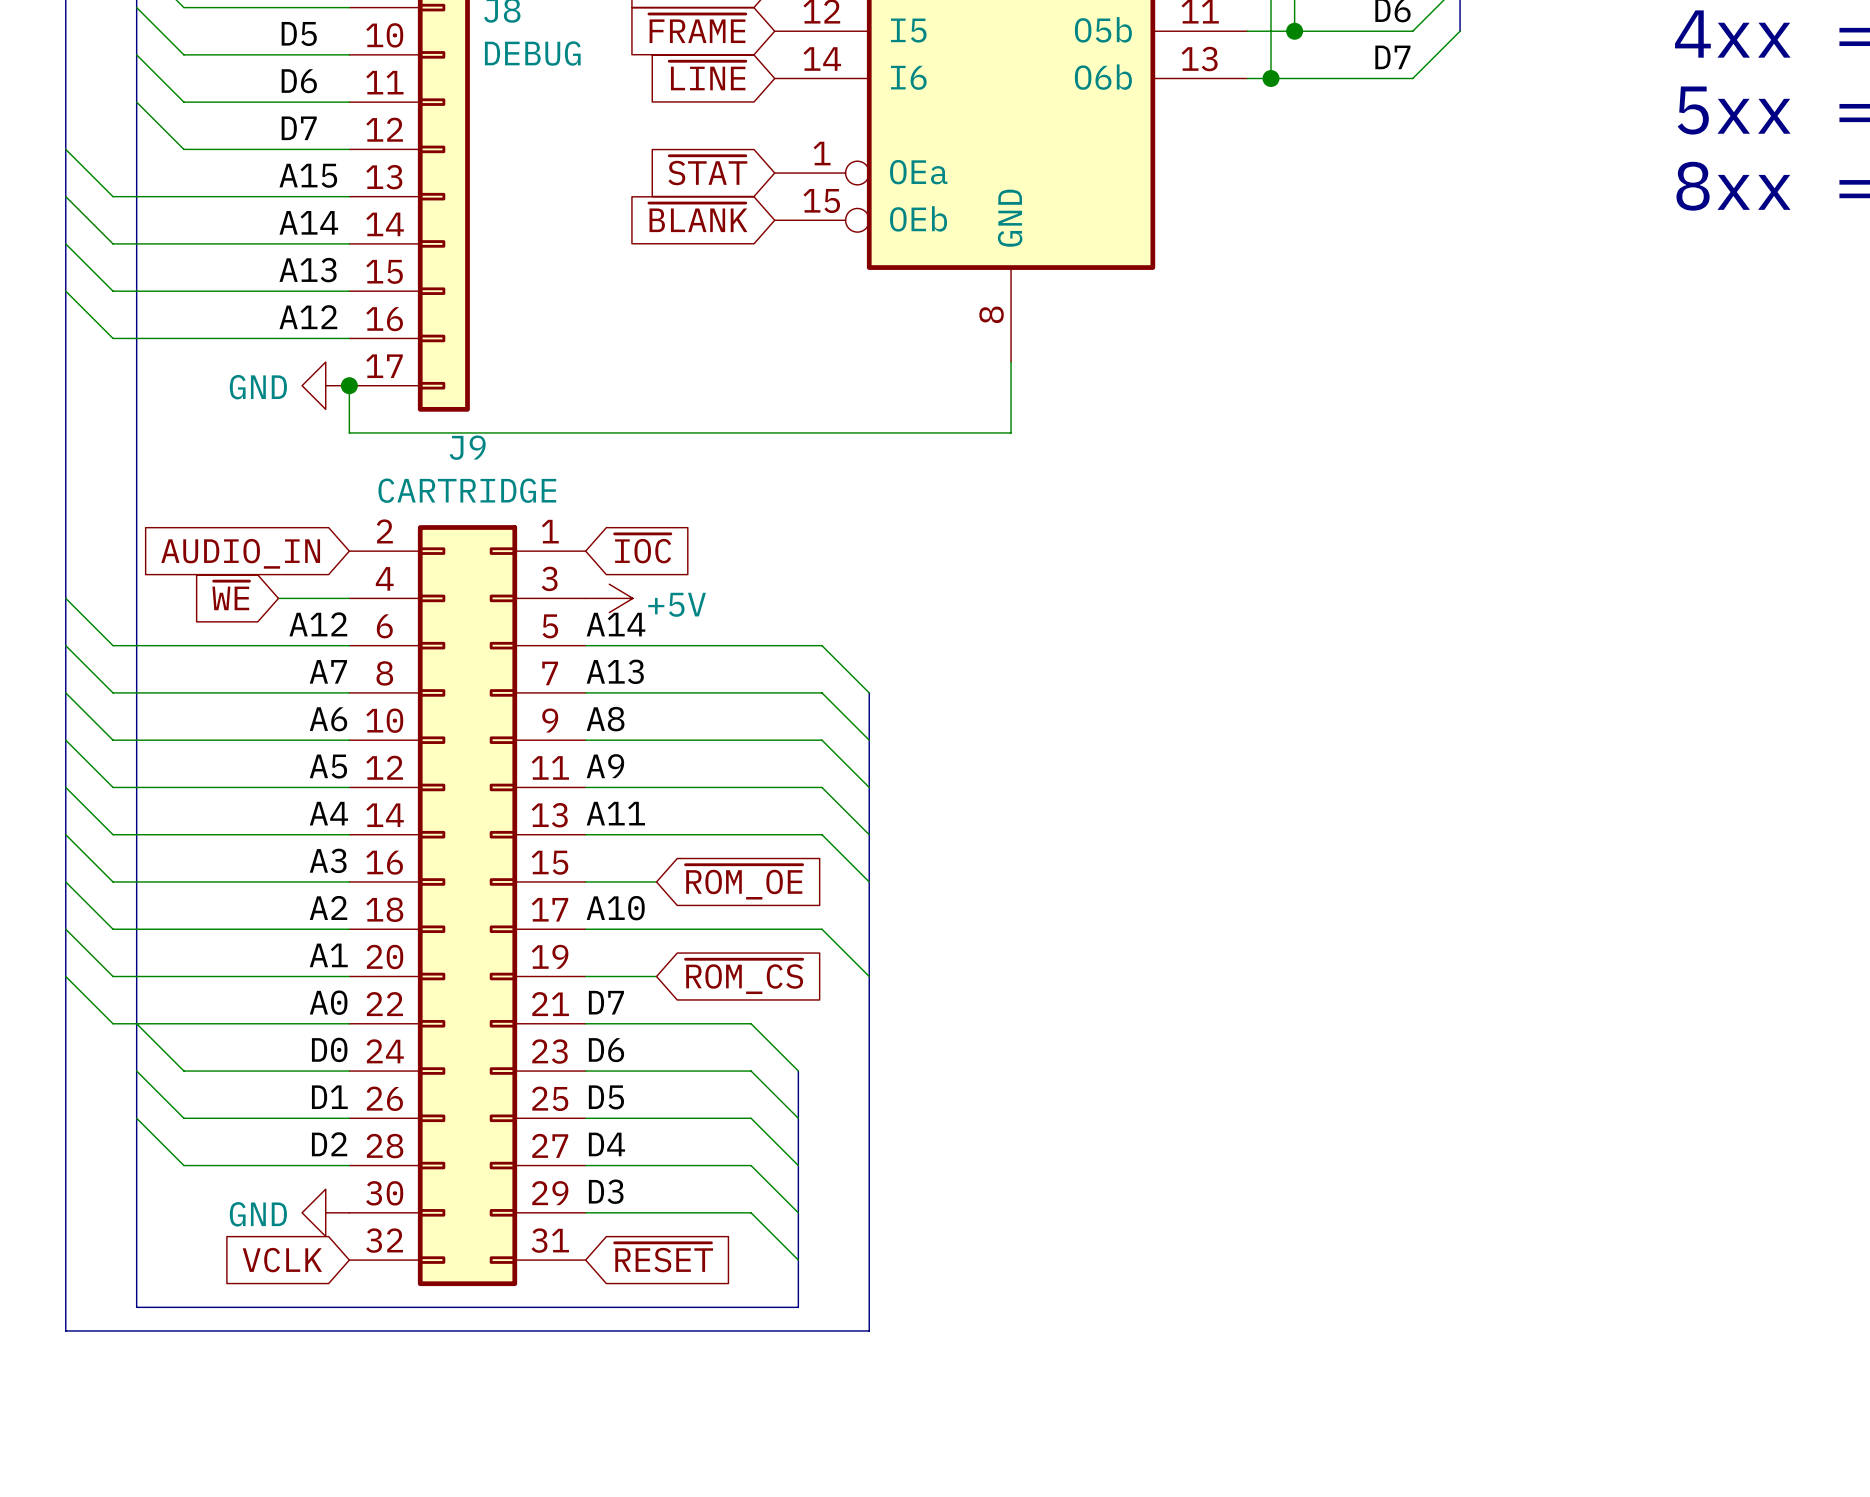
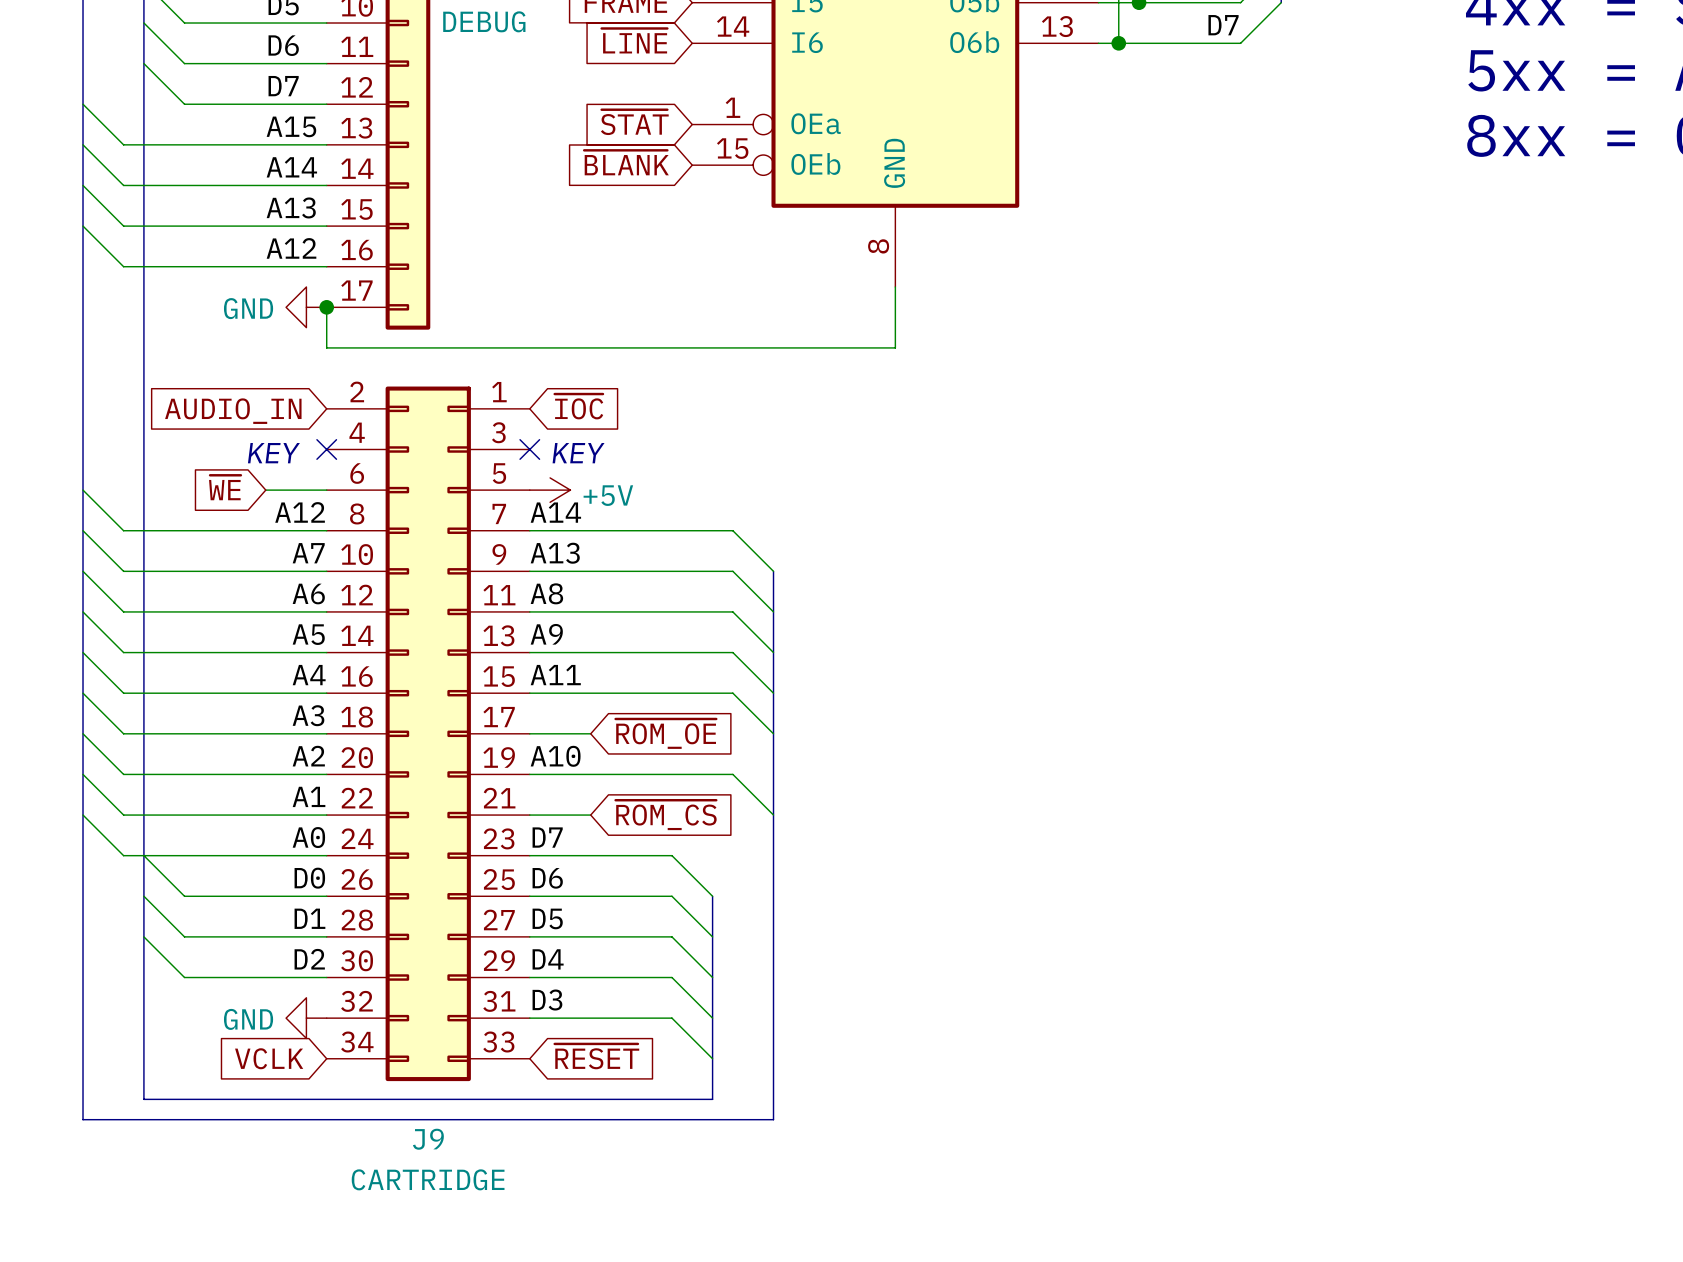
J9 name position: J9 (467, 447) -> J9 (428, 1139)
J9 value position: CARTRIDGE (467, 490) -> CARTRIDGE (428, 1179)
J9 symbol: [349, 525, 586, 1287] -> [326, 386, 530, 1082]
global label position: ~{IOC} (642, 548) -> ~{IOC} (578, 406)
no-connect mark: none -> (326, 449)
no-connect mark: none -> (529, 449)
global label position: AUDIO_IN (240, 553) -> AUDIO_IN (233, 411)
text: none -> KEY (273, 453)
text: none -> KEY (578, 453)

